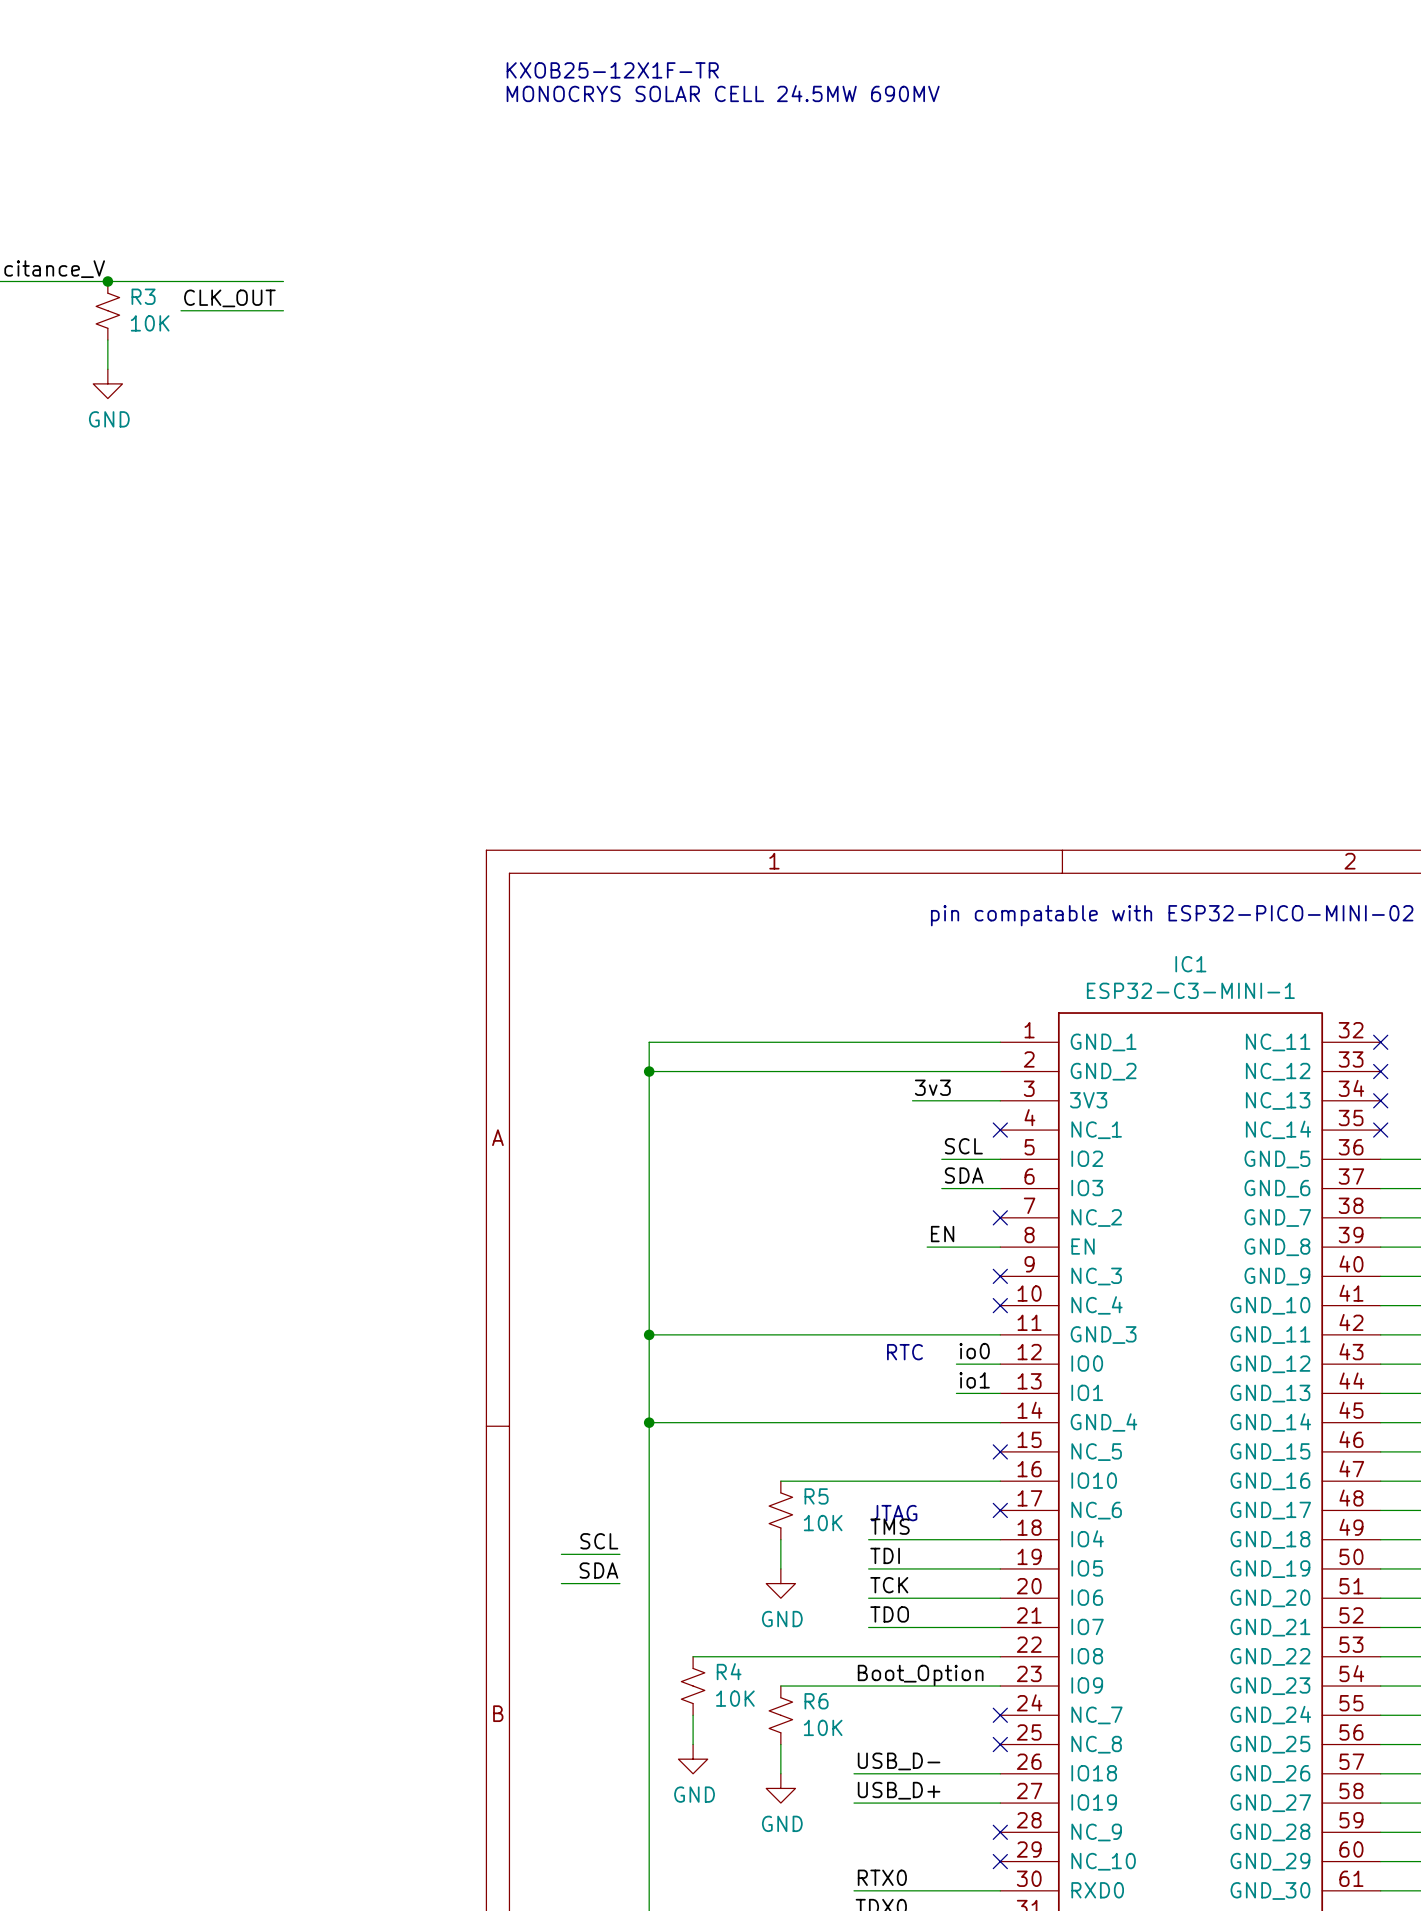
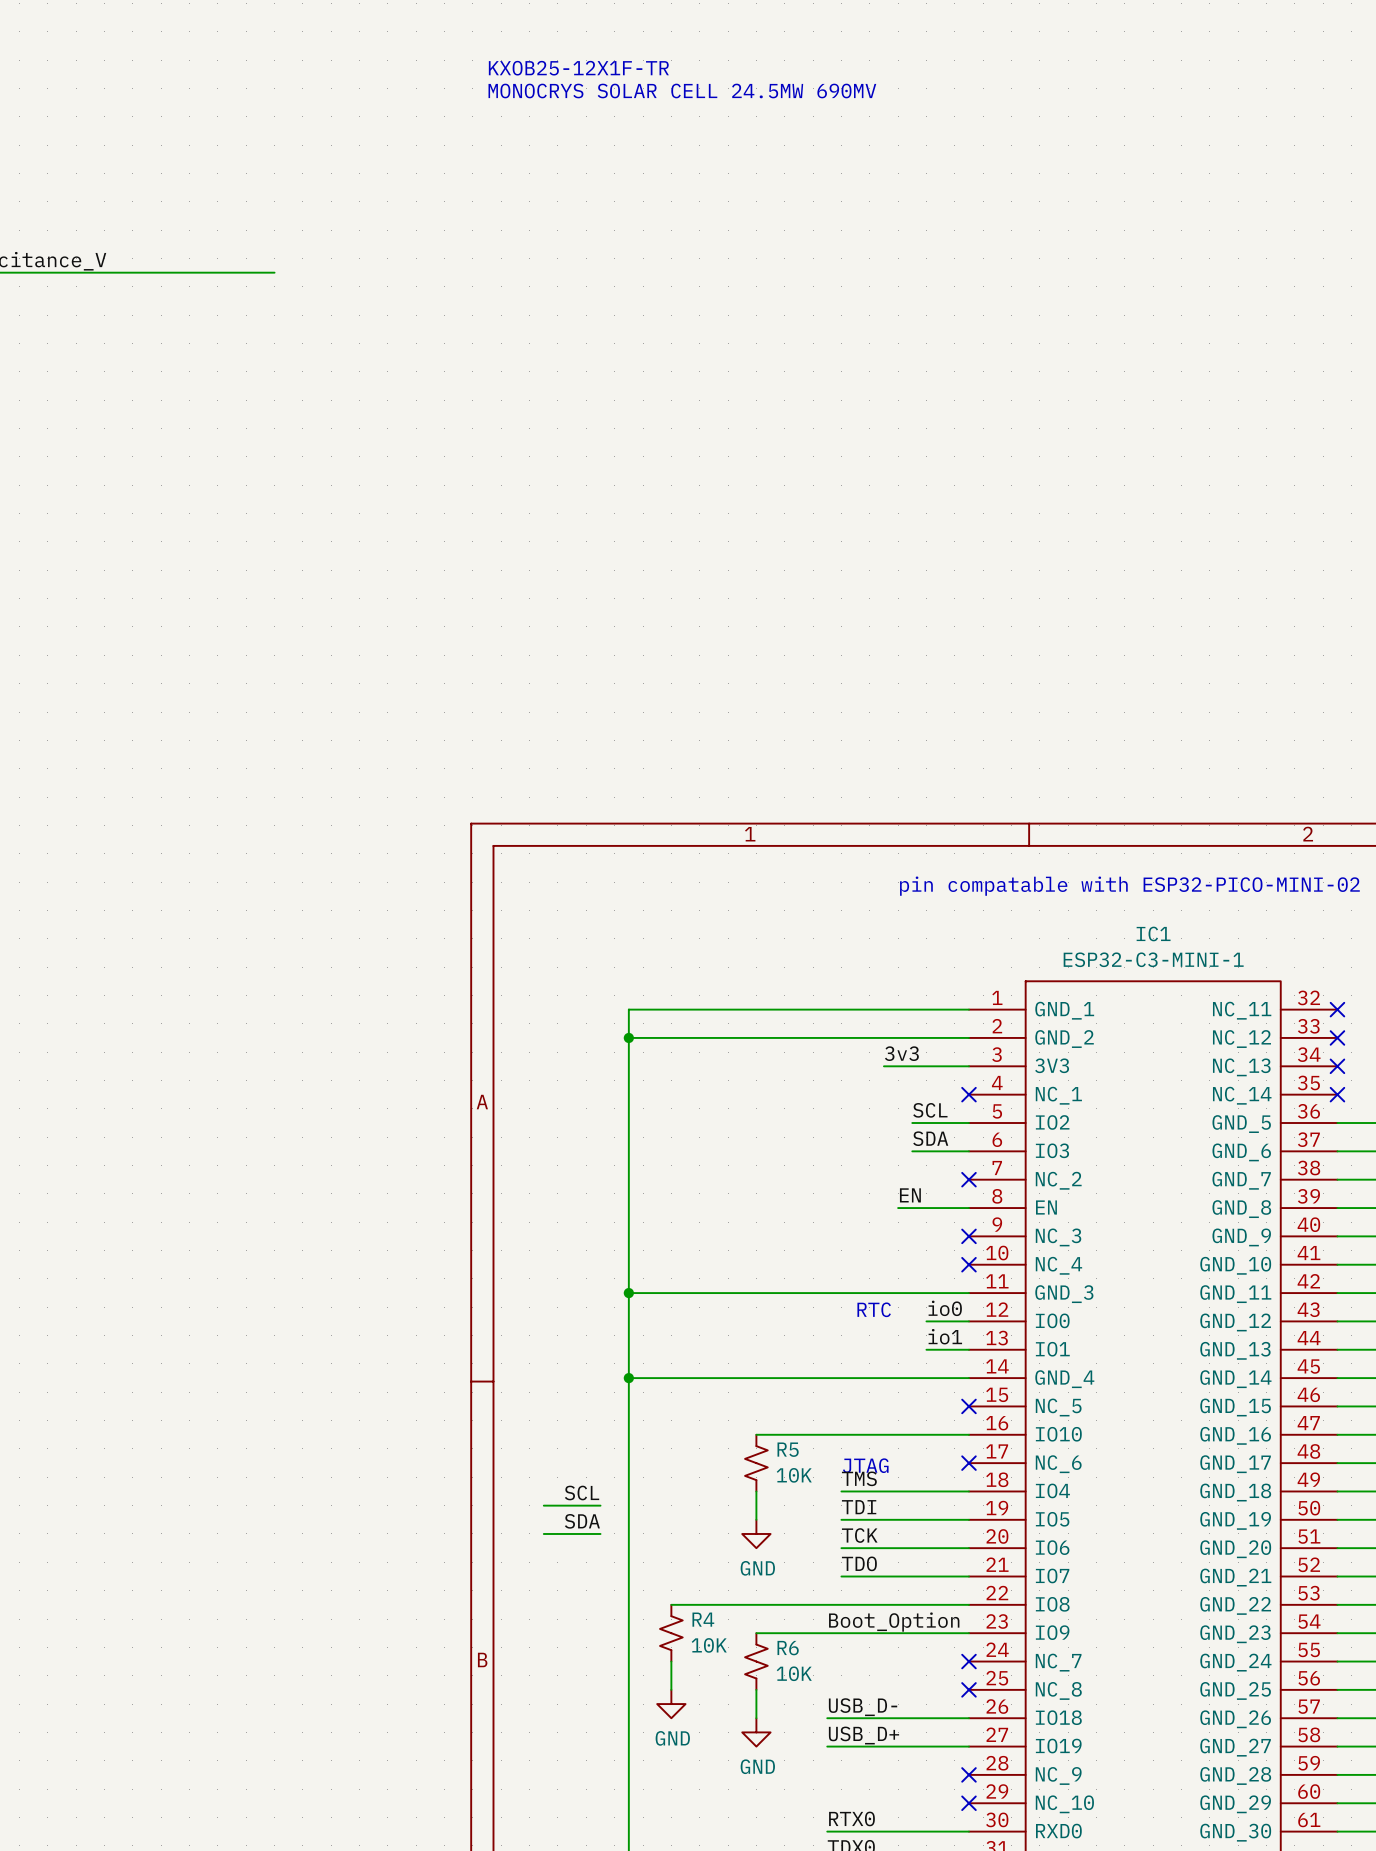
junction: (107, 281) -> none
label: CLK_OUT (229, 298) -> none
R3: 10K (107, 310) -> none
wire: (181, 310) (283, 310) -> none
wire: (107, 340) (107, 369) -> none
power symbol: GND (107, 383) -> none

